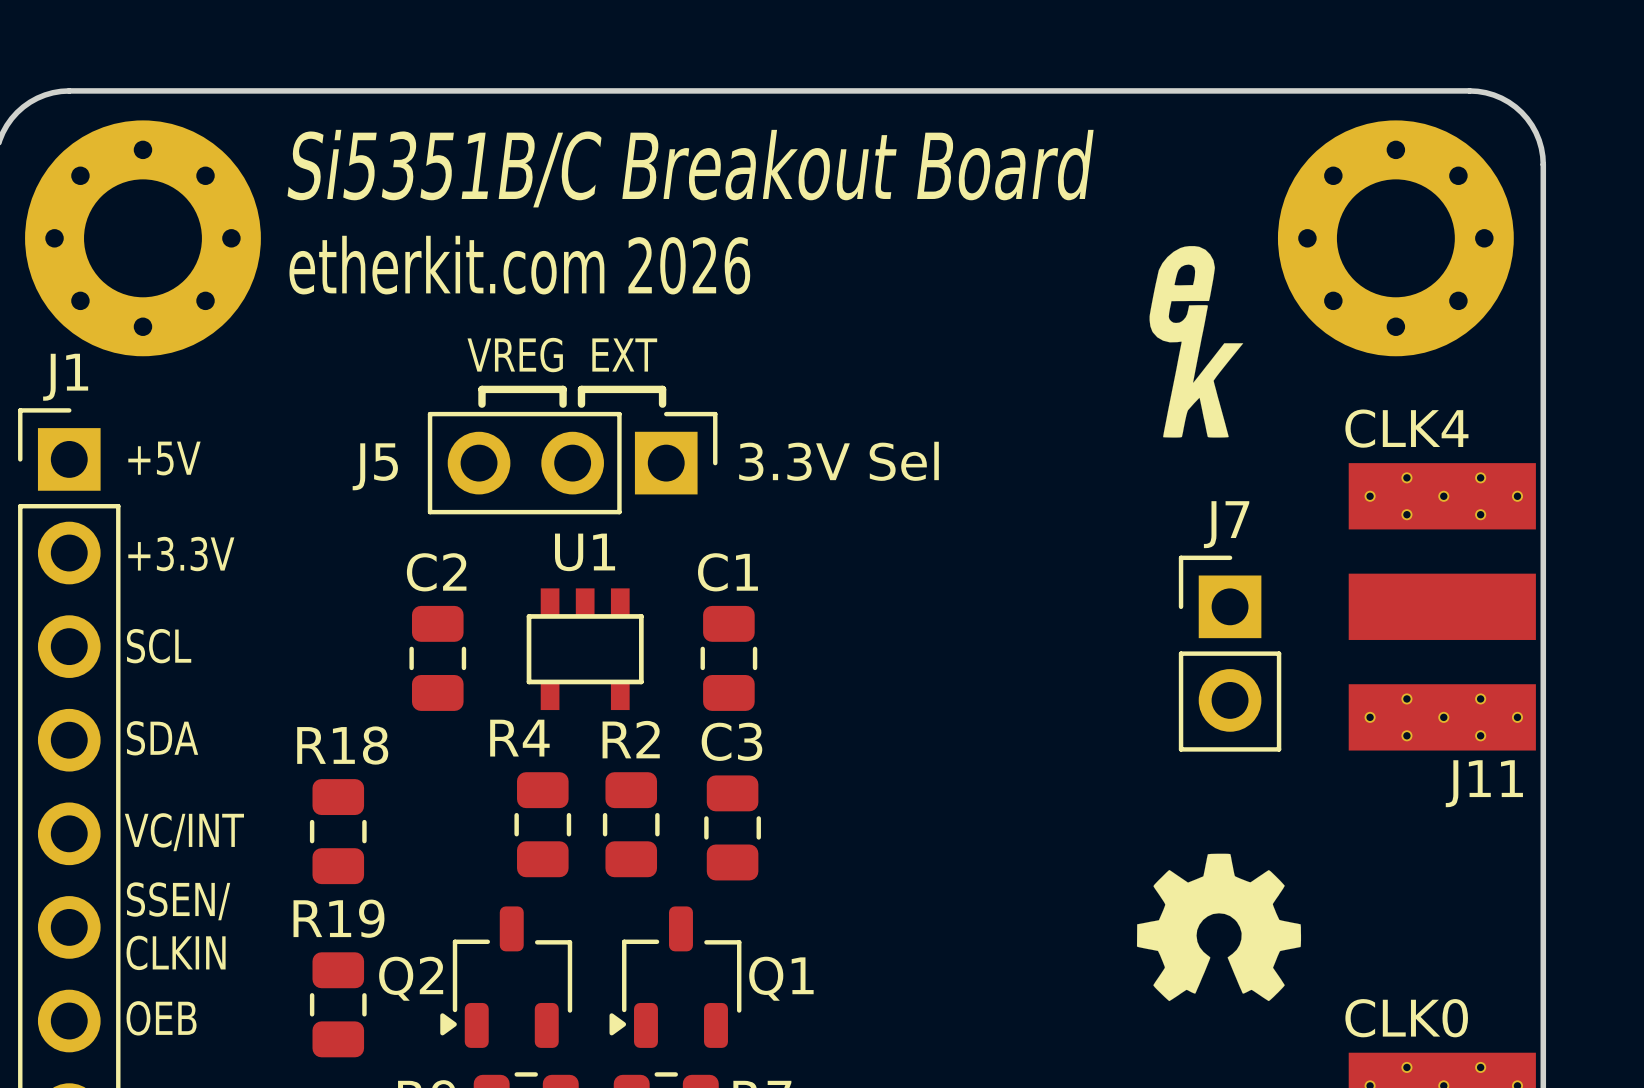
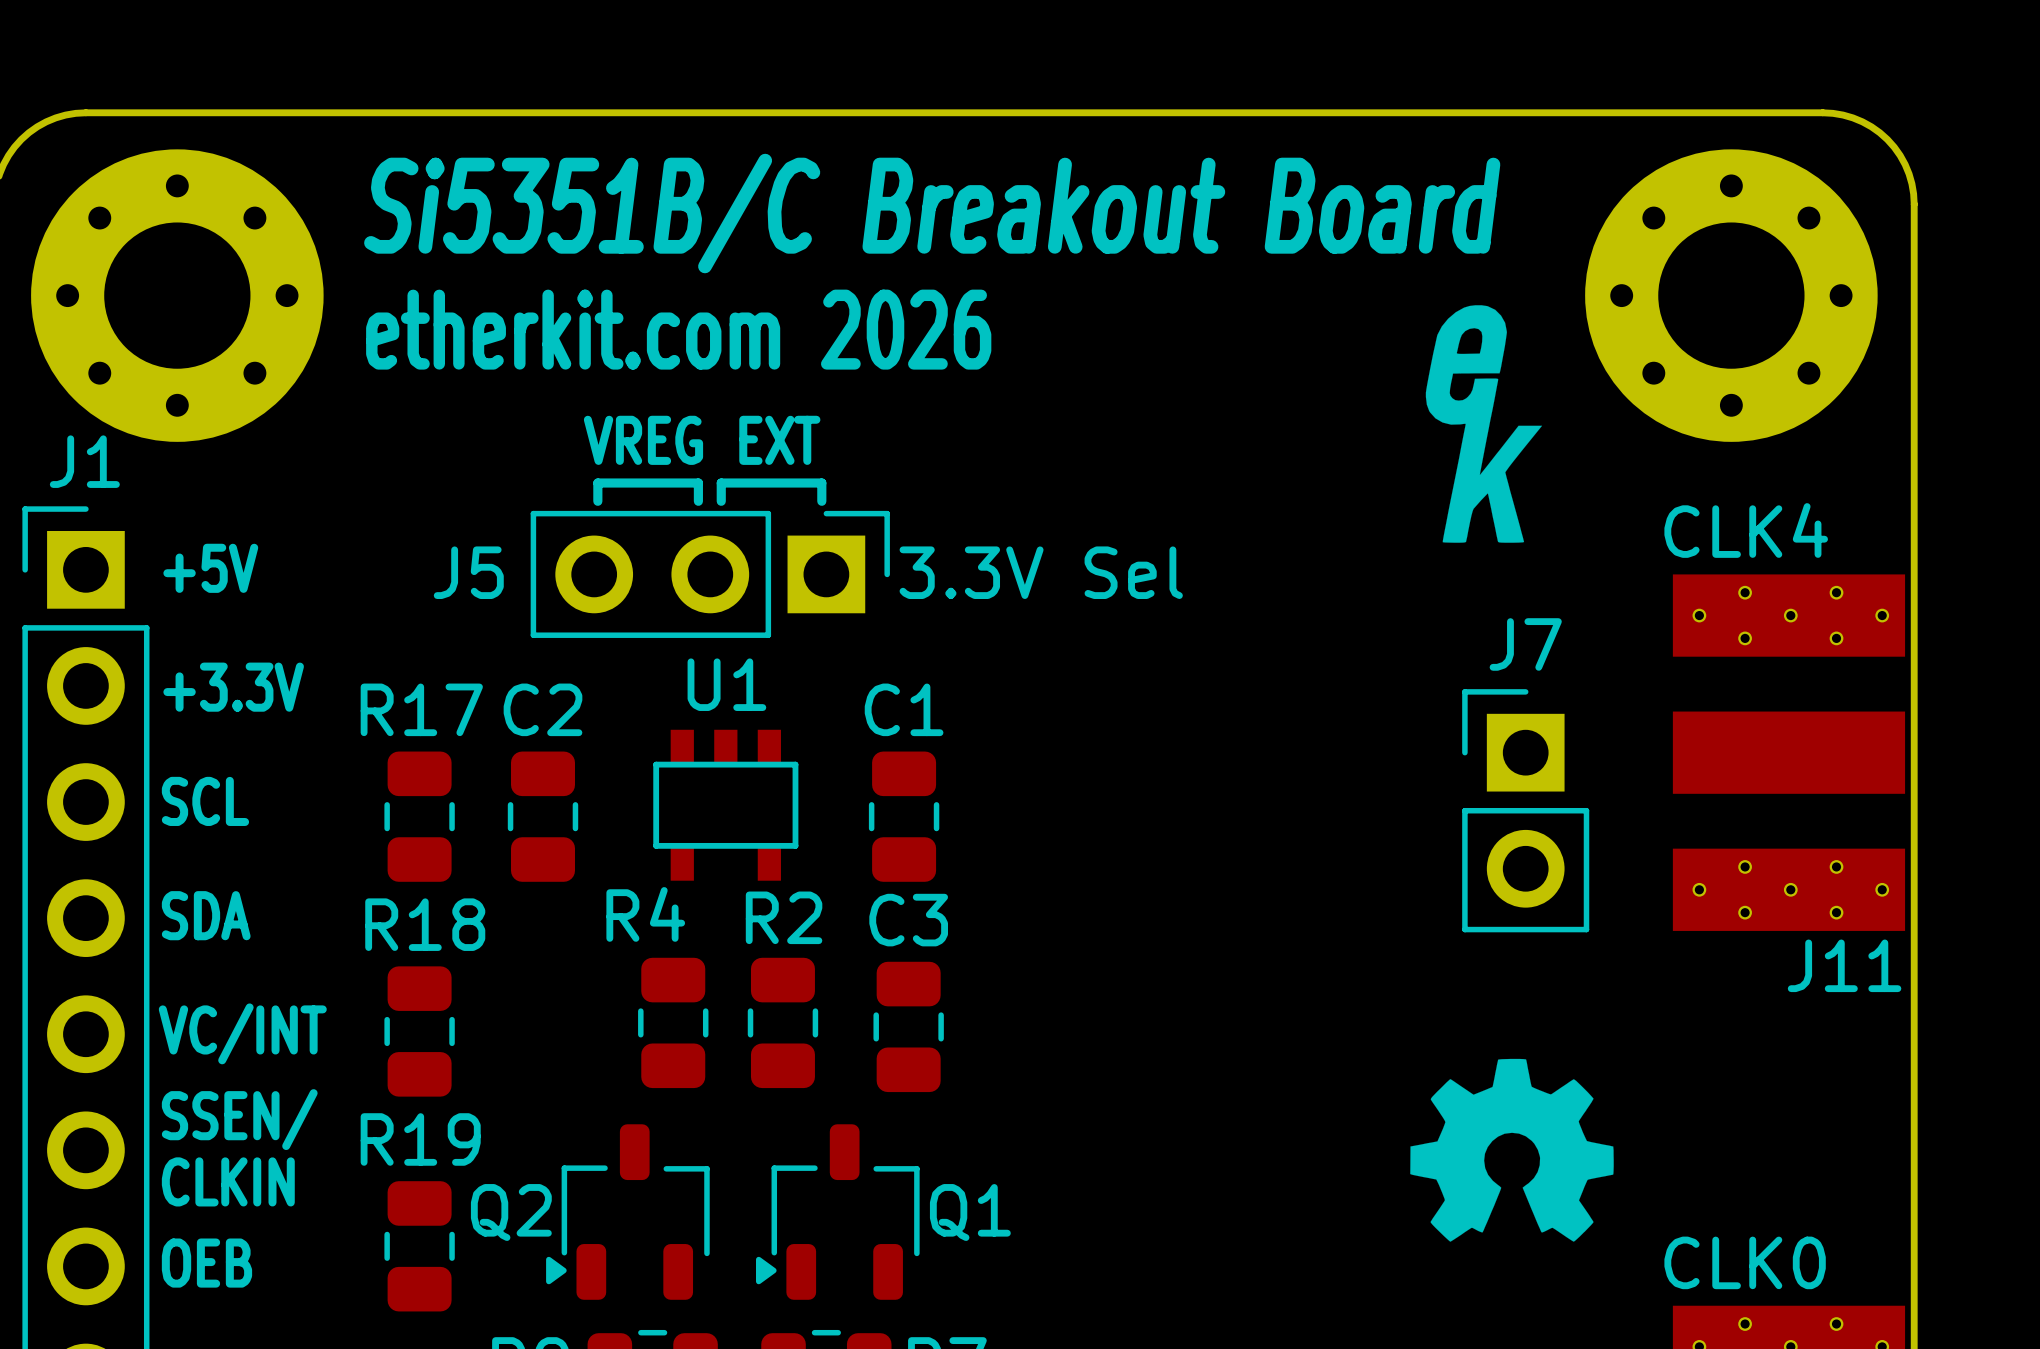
R17: none -> (419, 816)

